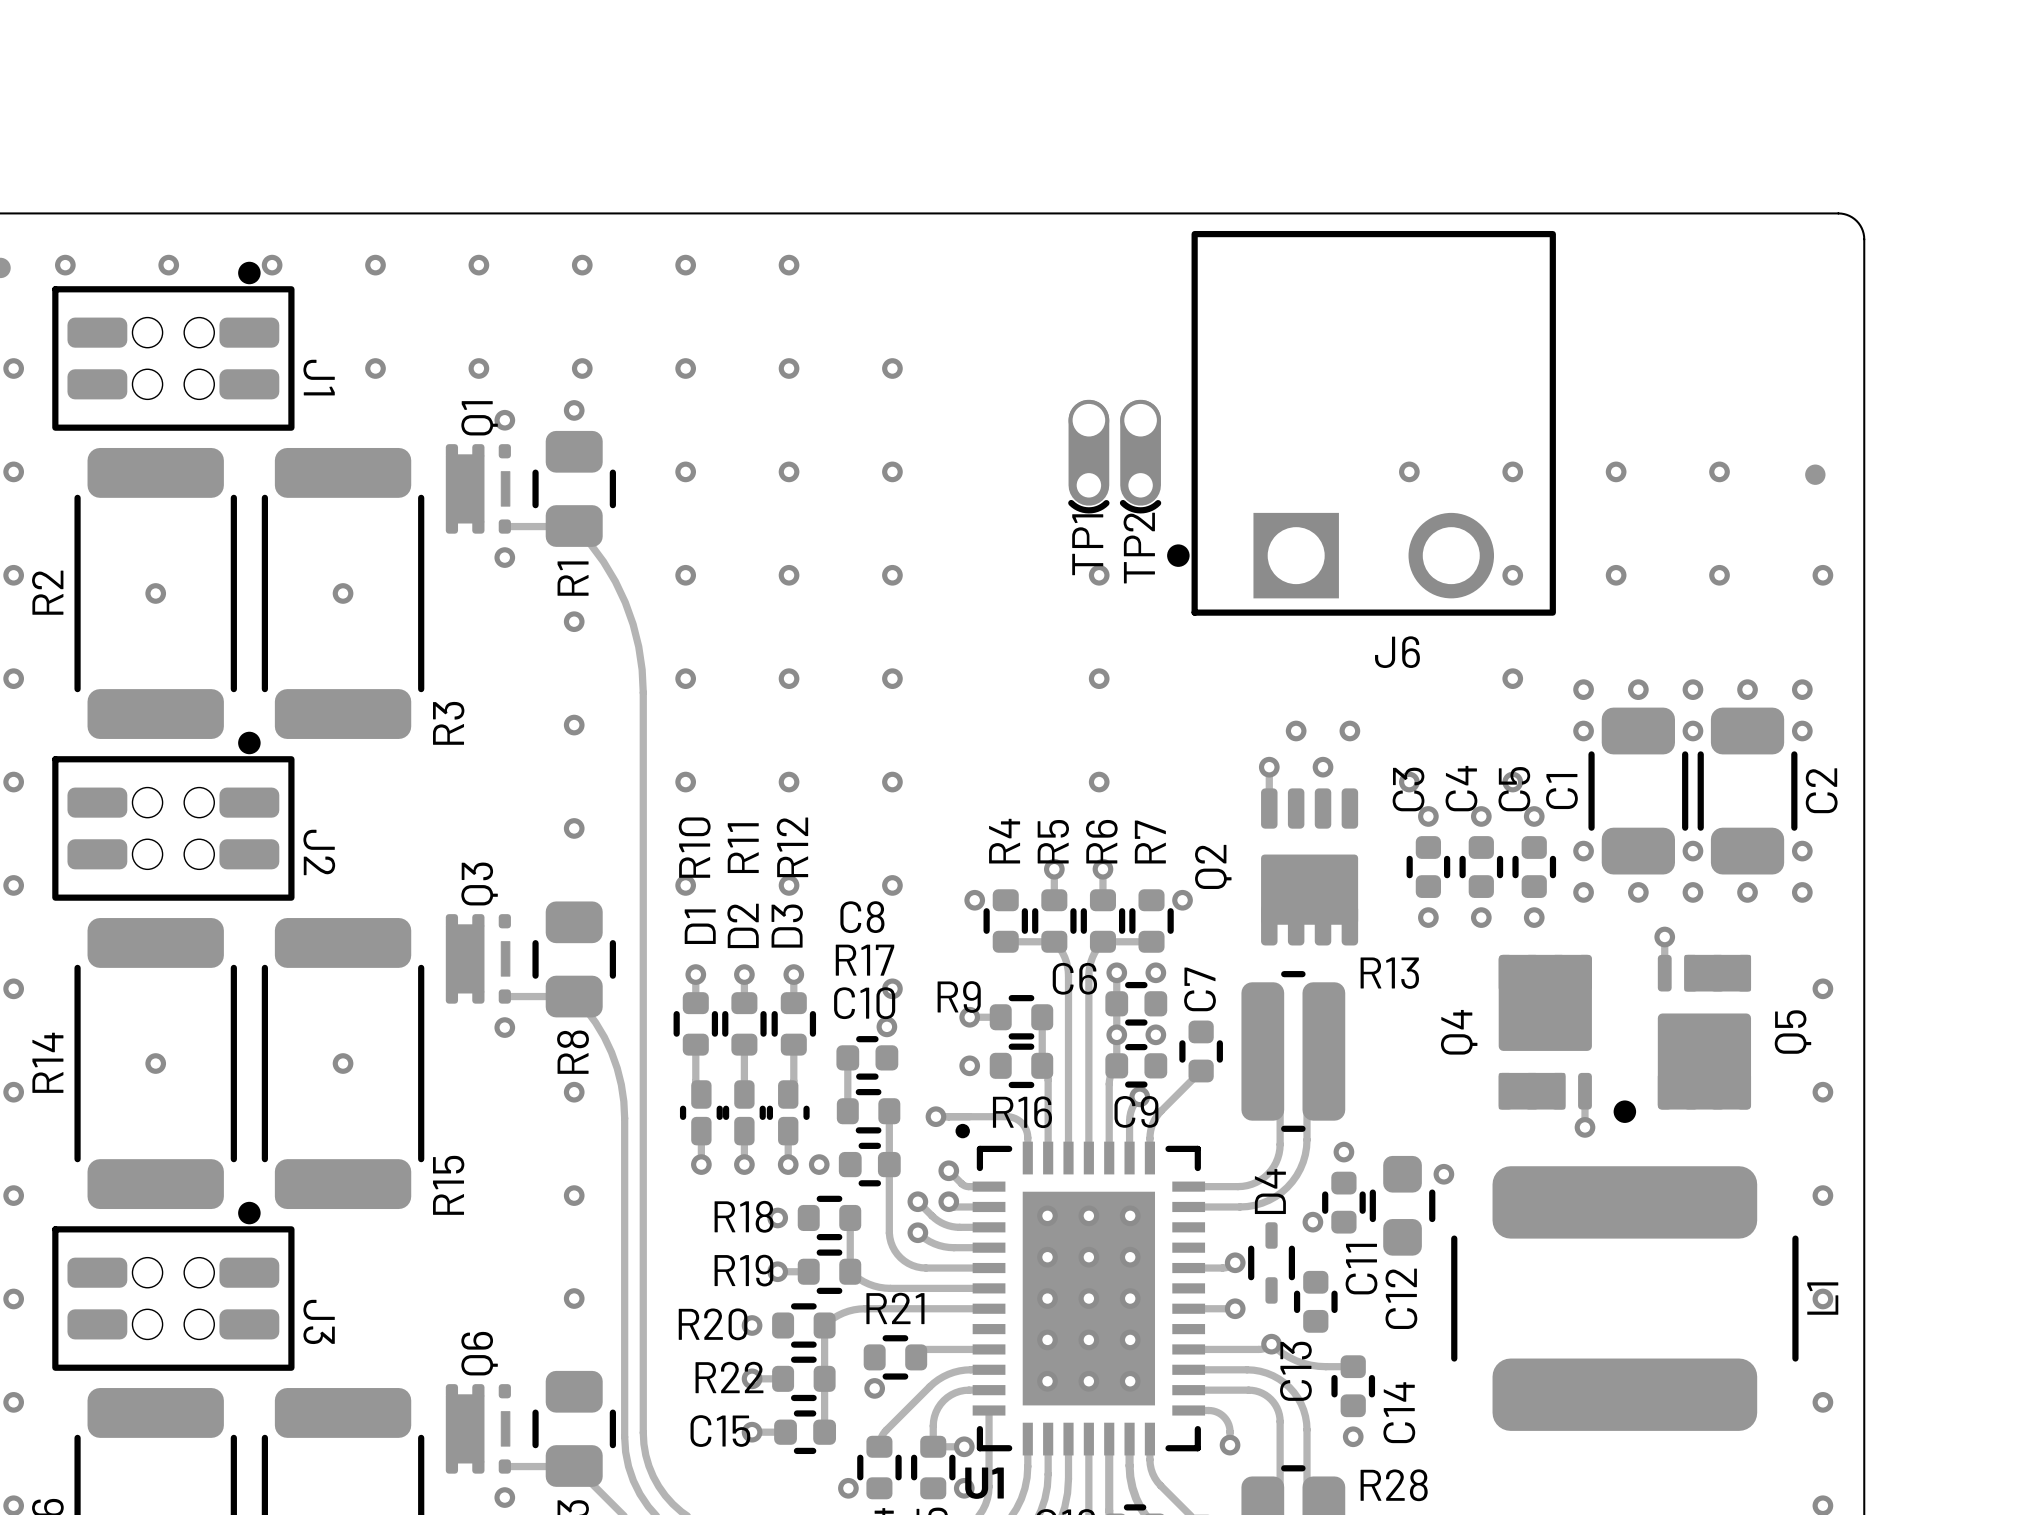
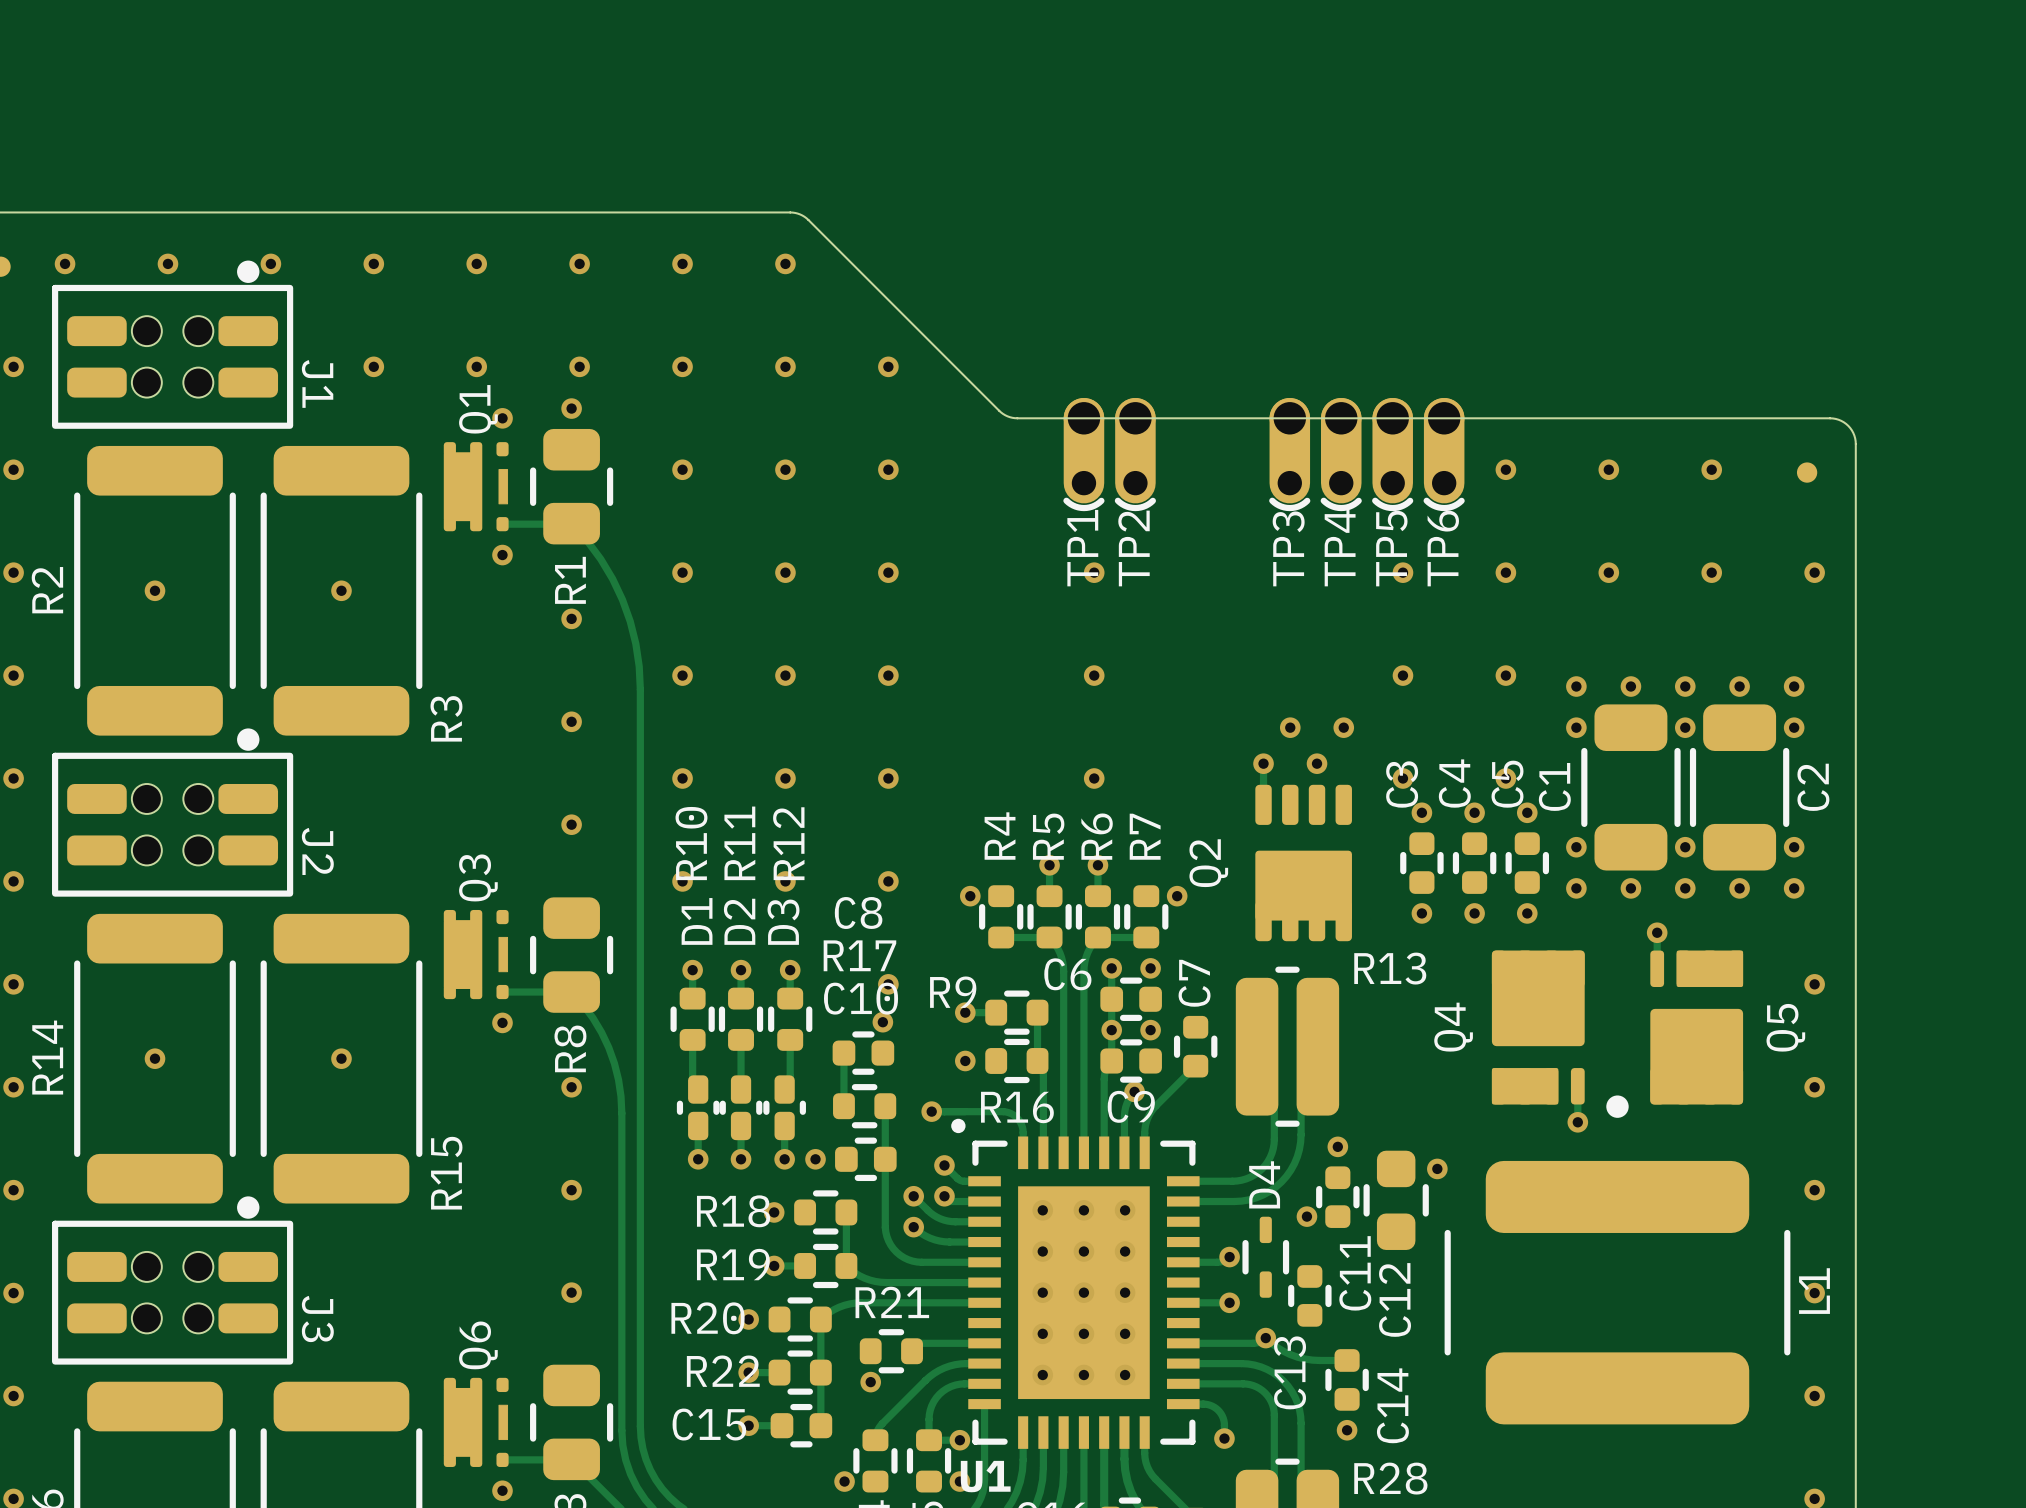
board edge: (793, 213) (1844, 214) (1858, 223) (1864, 236) (1864, 446) -> (790, 212) (800, 214) (808, 220) (999, 410) (1012, 417) (1830, 418) (1838, 419) (1848, 425) (1854, 435) (1855, 444)
J6: (1361, 423) -> none
TP3: none -> (1289, 454)
TP4: none -> (1341, 454)
TP5: none -> (1392, 454)
TP6: none -> (1444, 454)
via: (1409, 471) -> none
via: none -> (1402, 572)
via: none -> (1402, 675)

